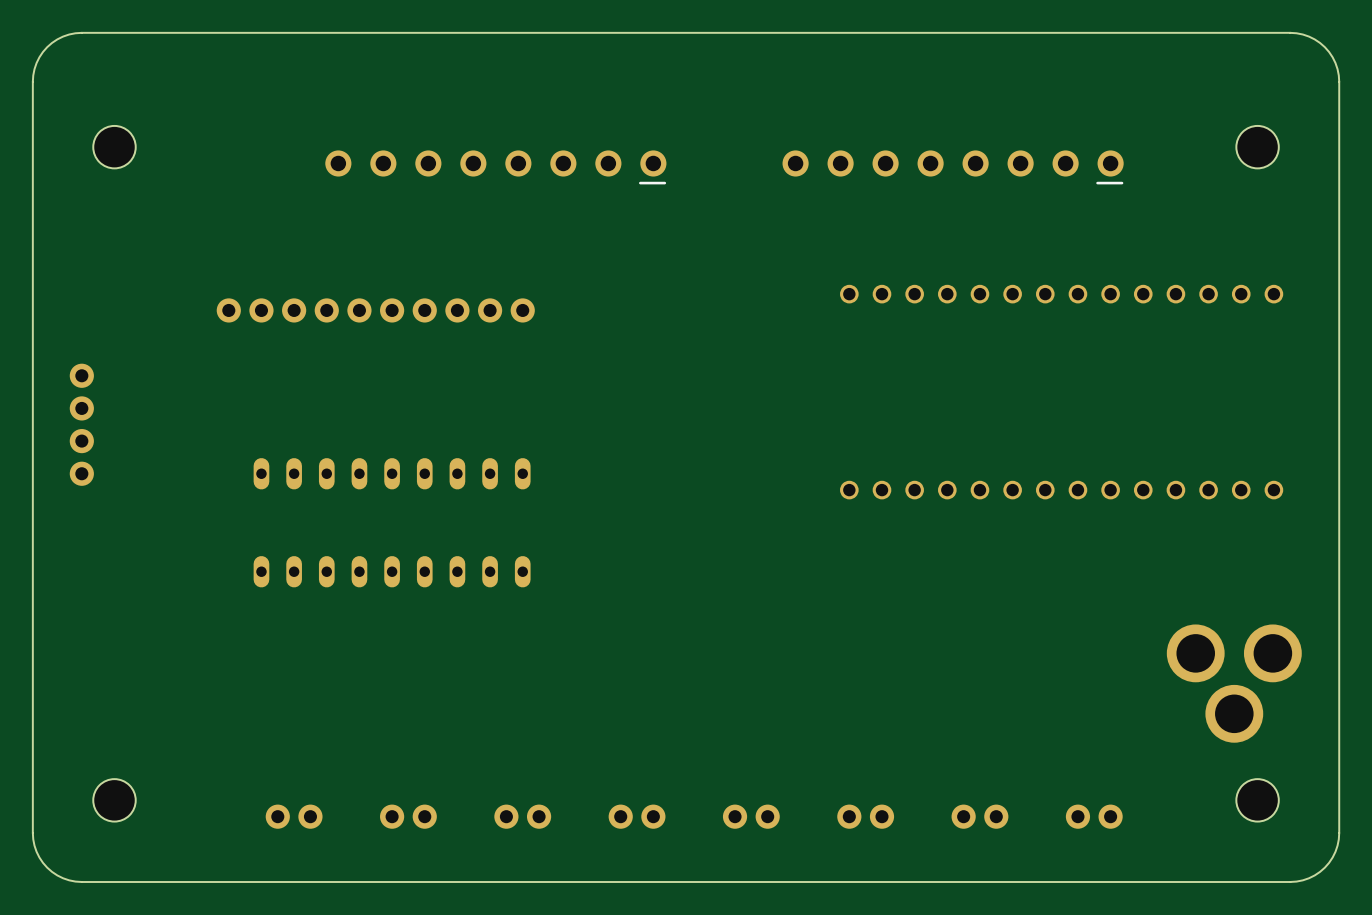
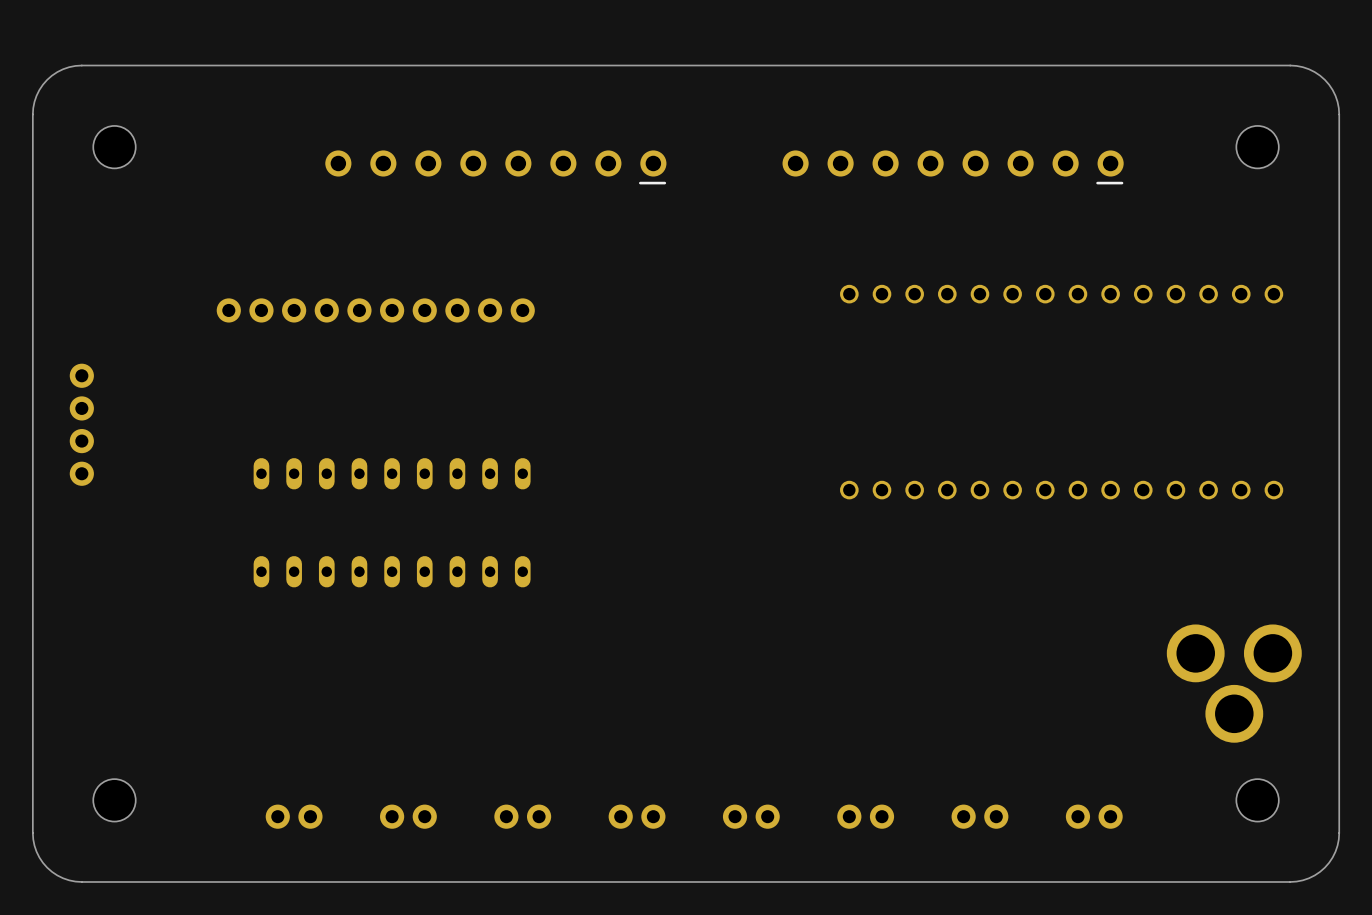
board edge: (1339, 114) (1338, 75) (1332, 57) (1324, 47) (1314, 39) (1302, 34) (1290, 32) (81, 32) (69, 34) (57, 39) (47, 47) (39, 57) (33, 75) (32, 114) -> (1339, 114) (1335, 95) (1324, 79) (1308, 69) (1290, 65) (81, 65) (63, 69) (47, 79) (36, 95) (32, 114)

